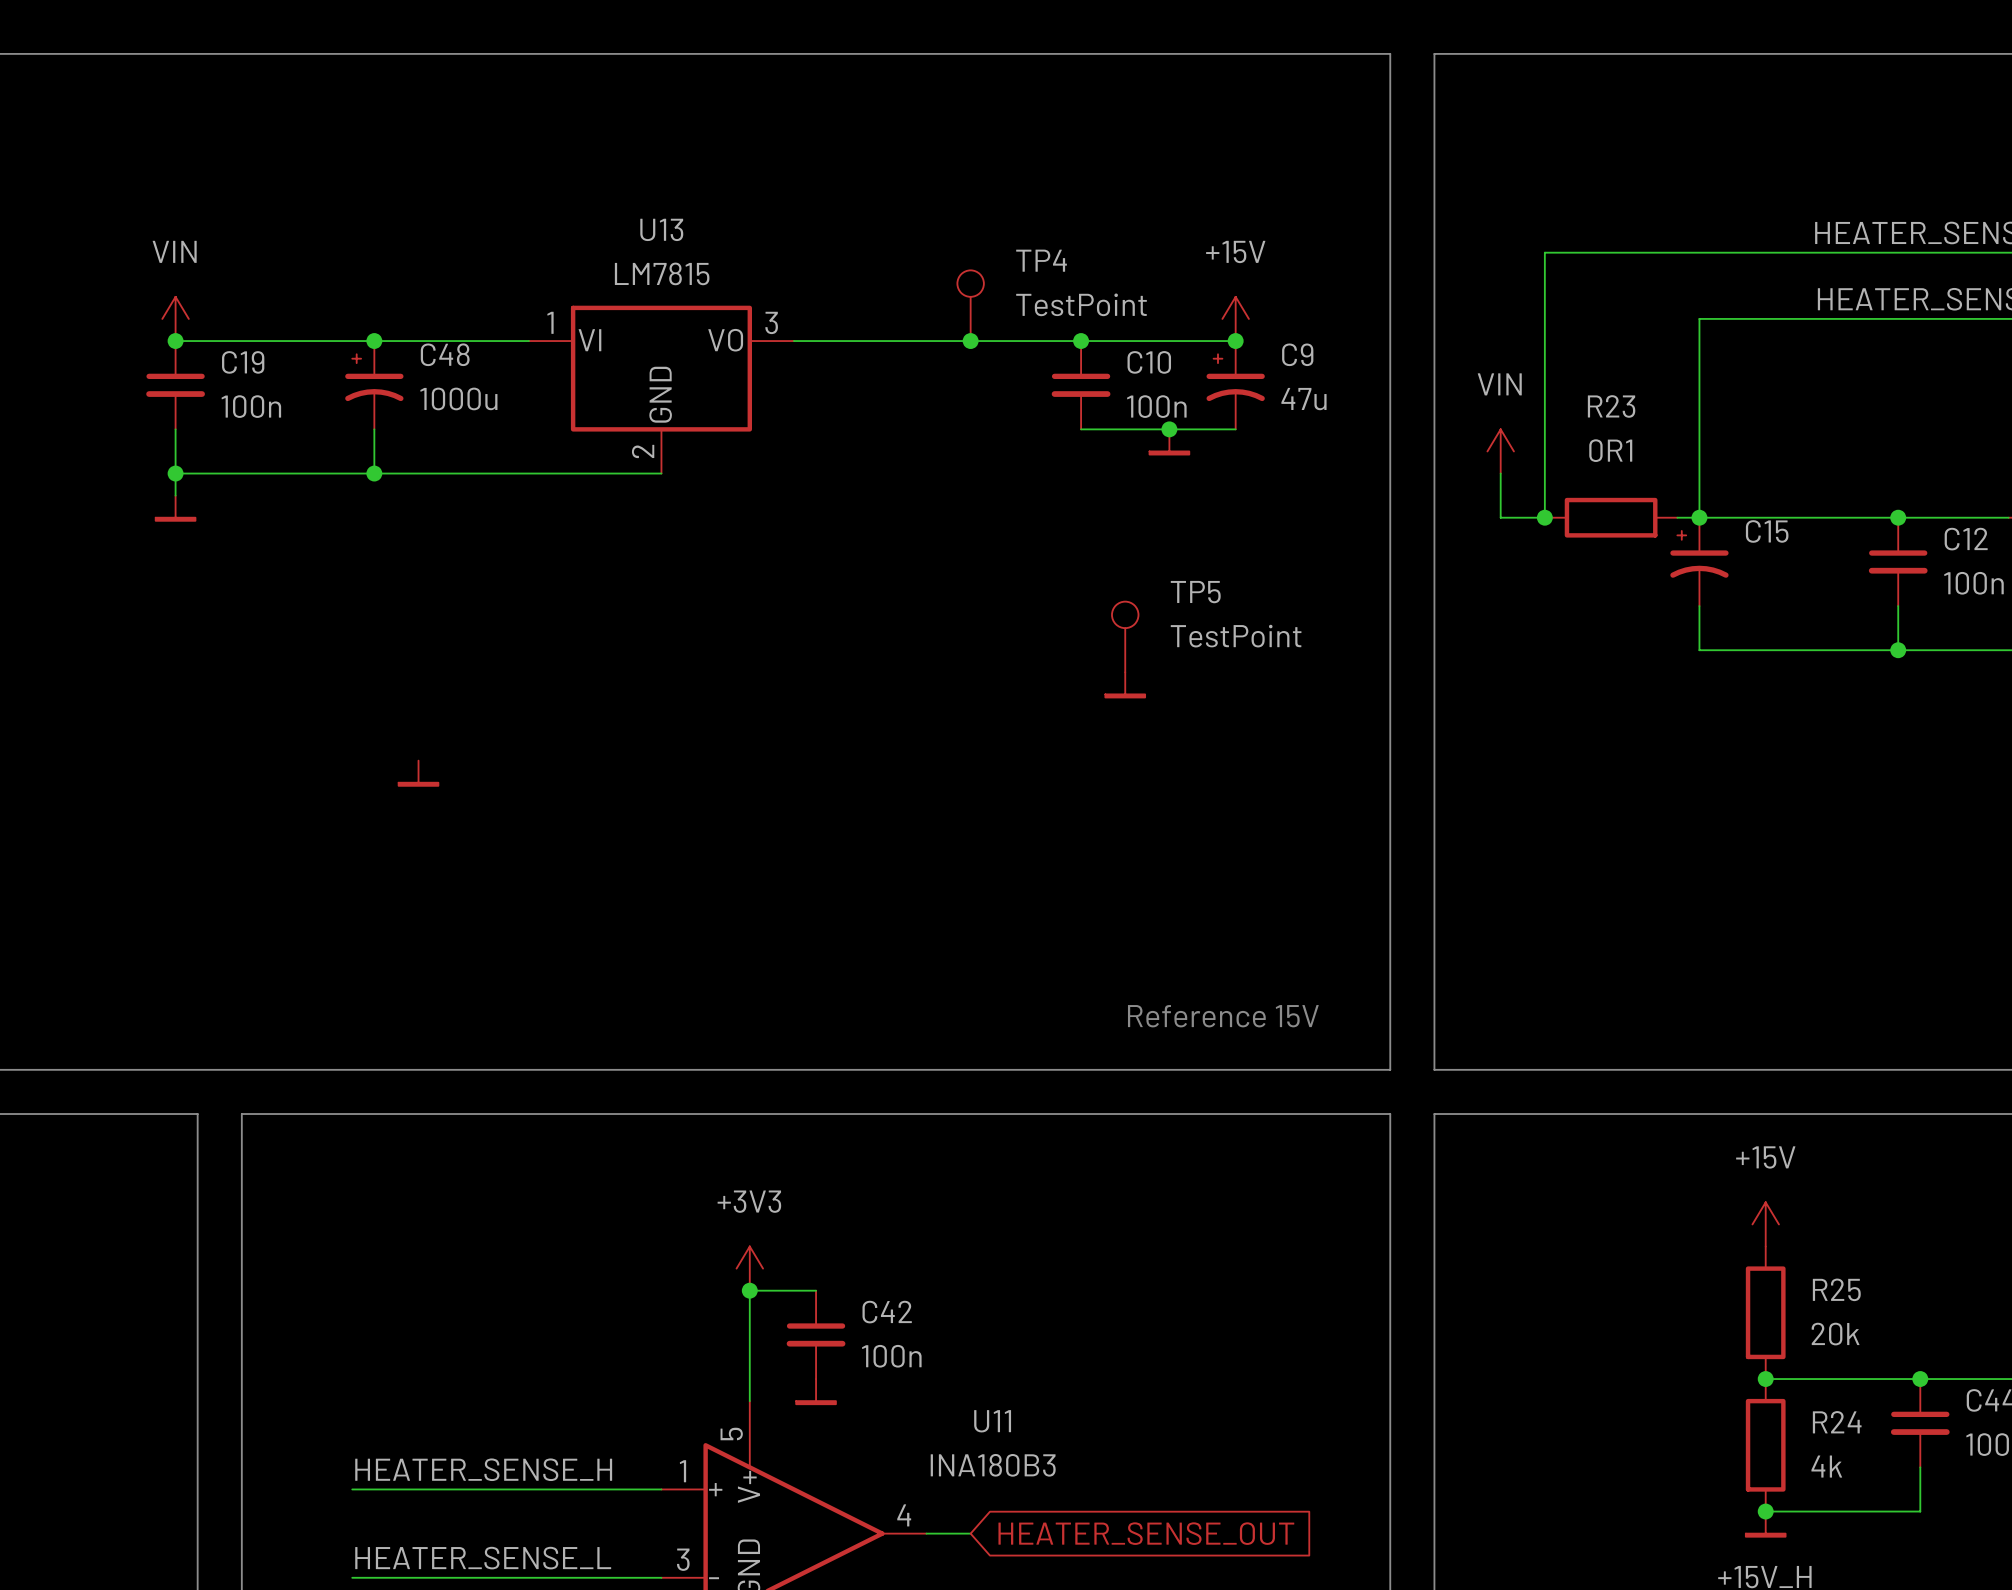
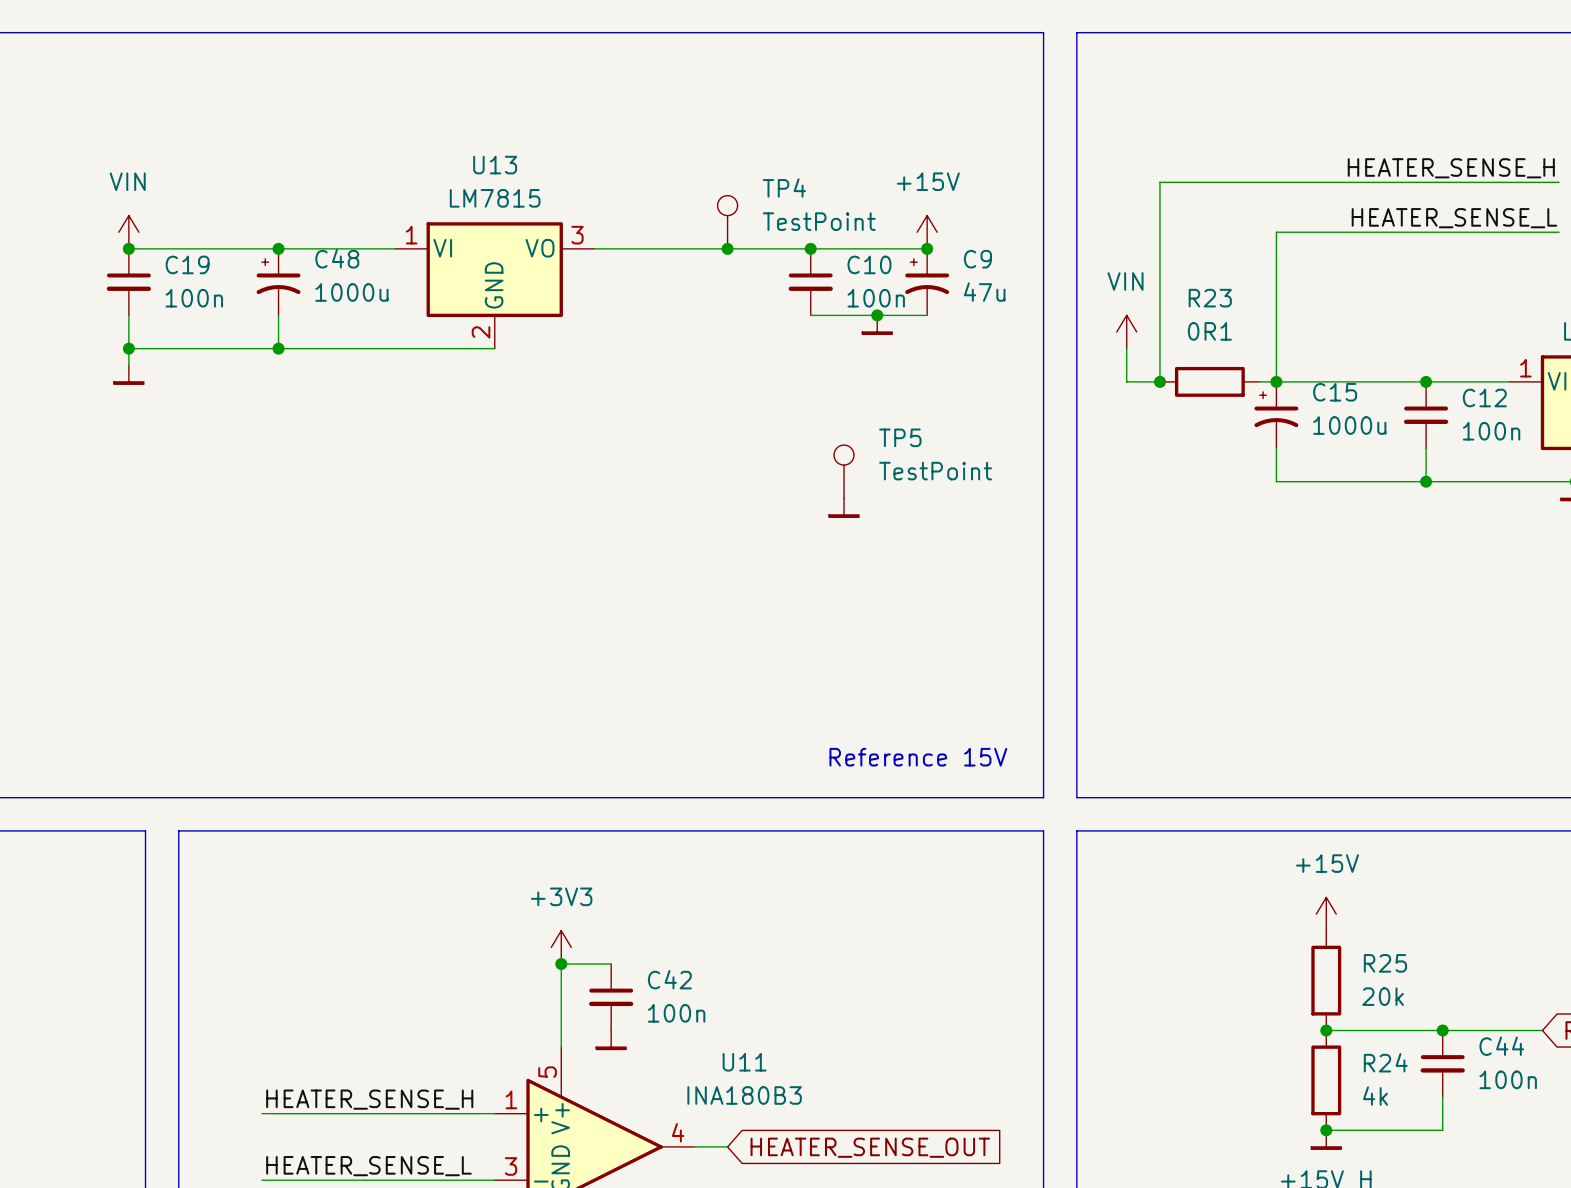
C15 value: none -> 1000u (1349, 425)
power symbol: (418, 773) -> none

